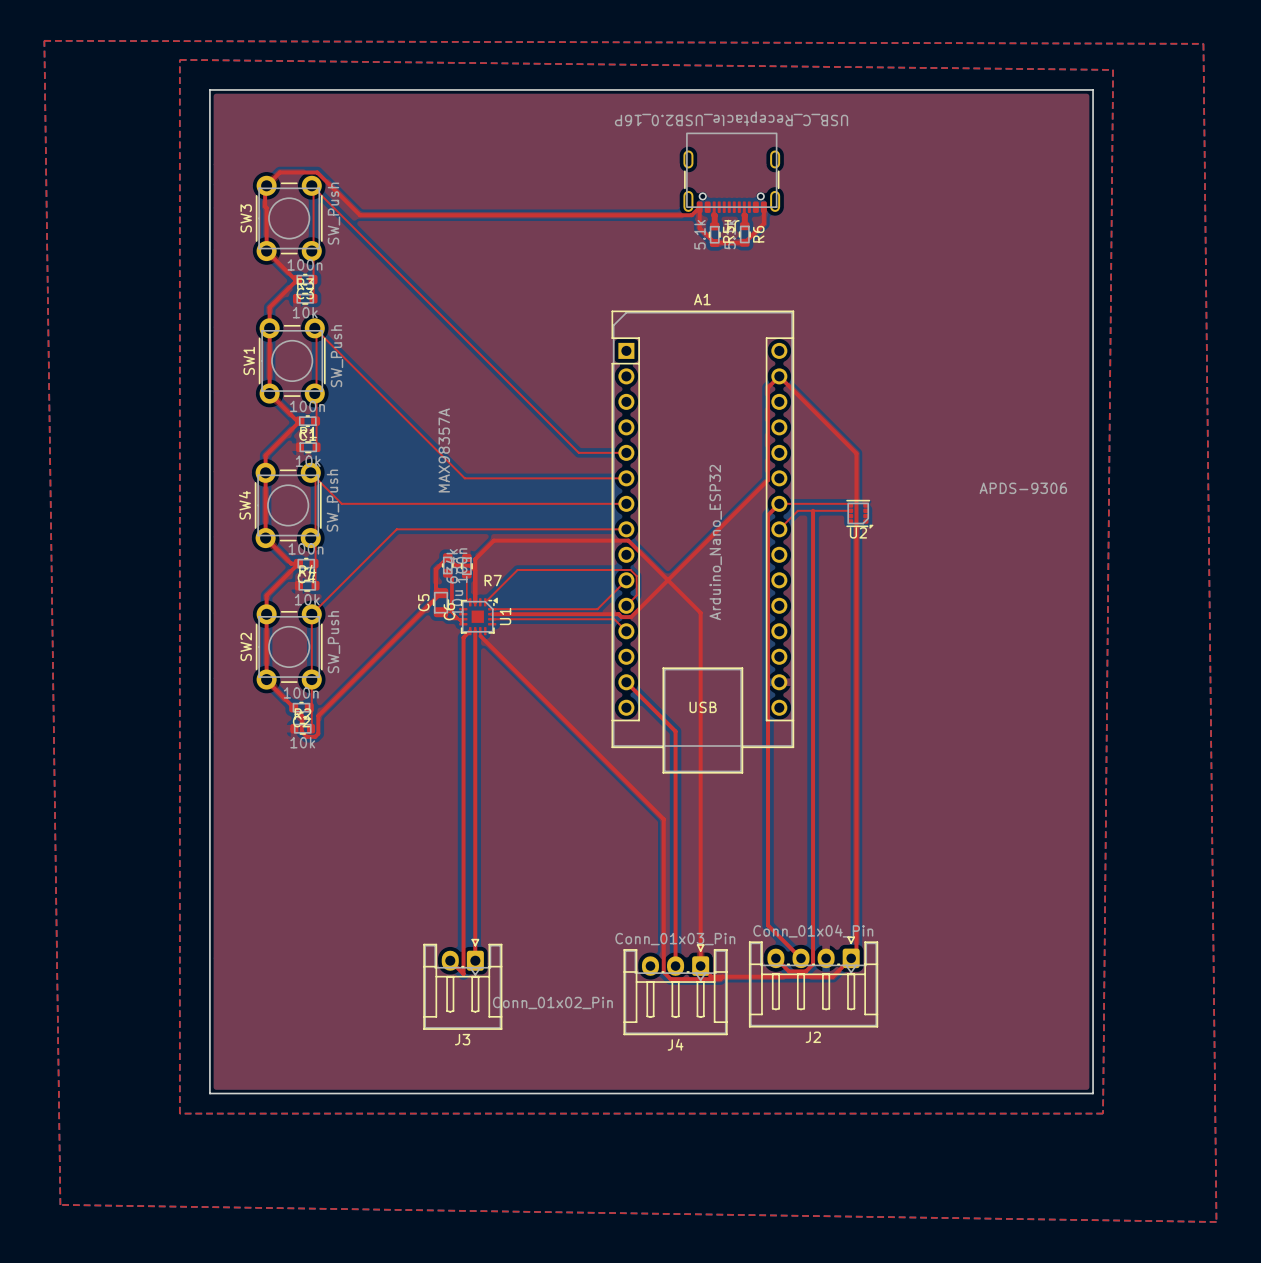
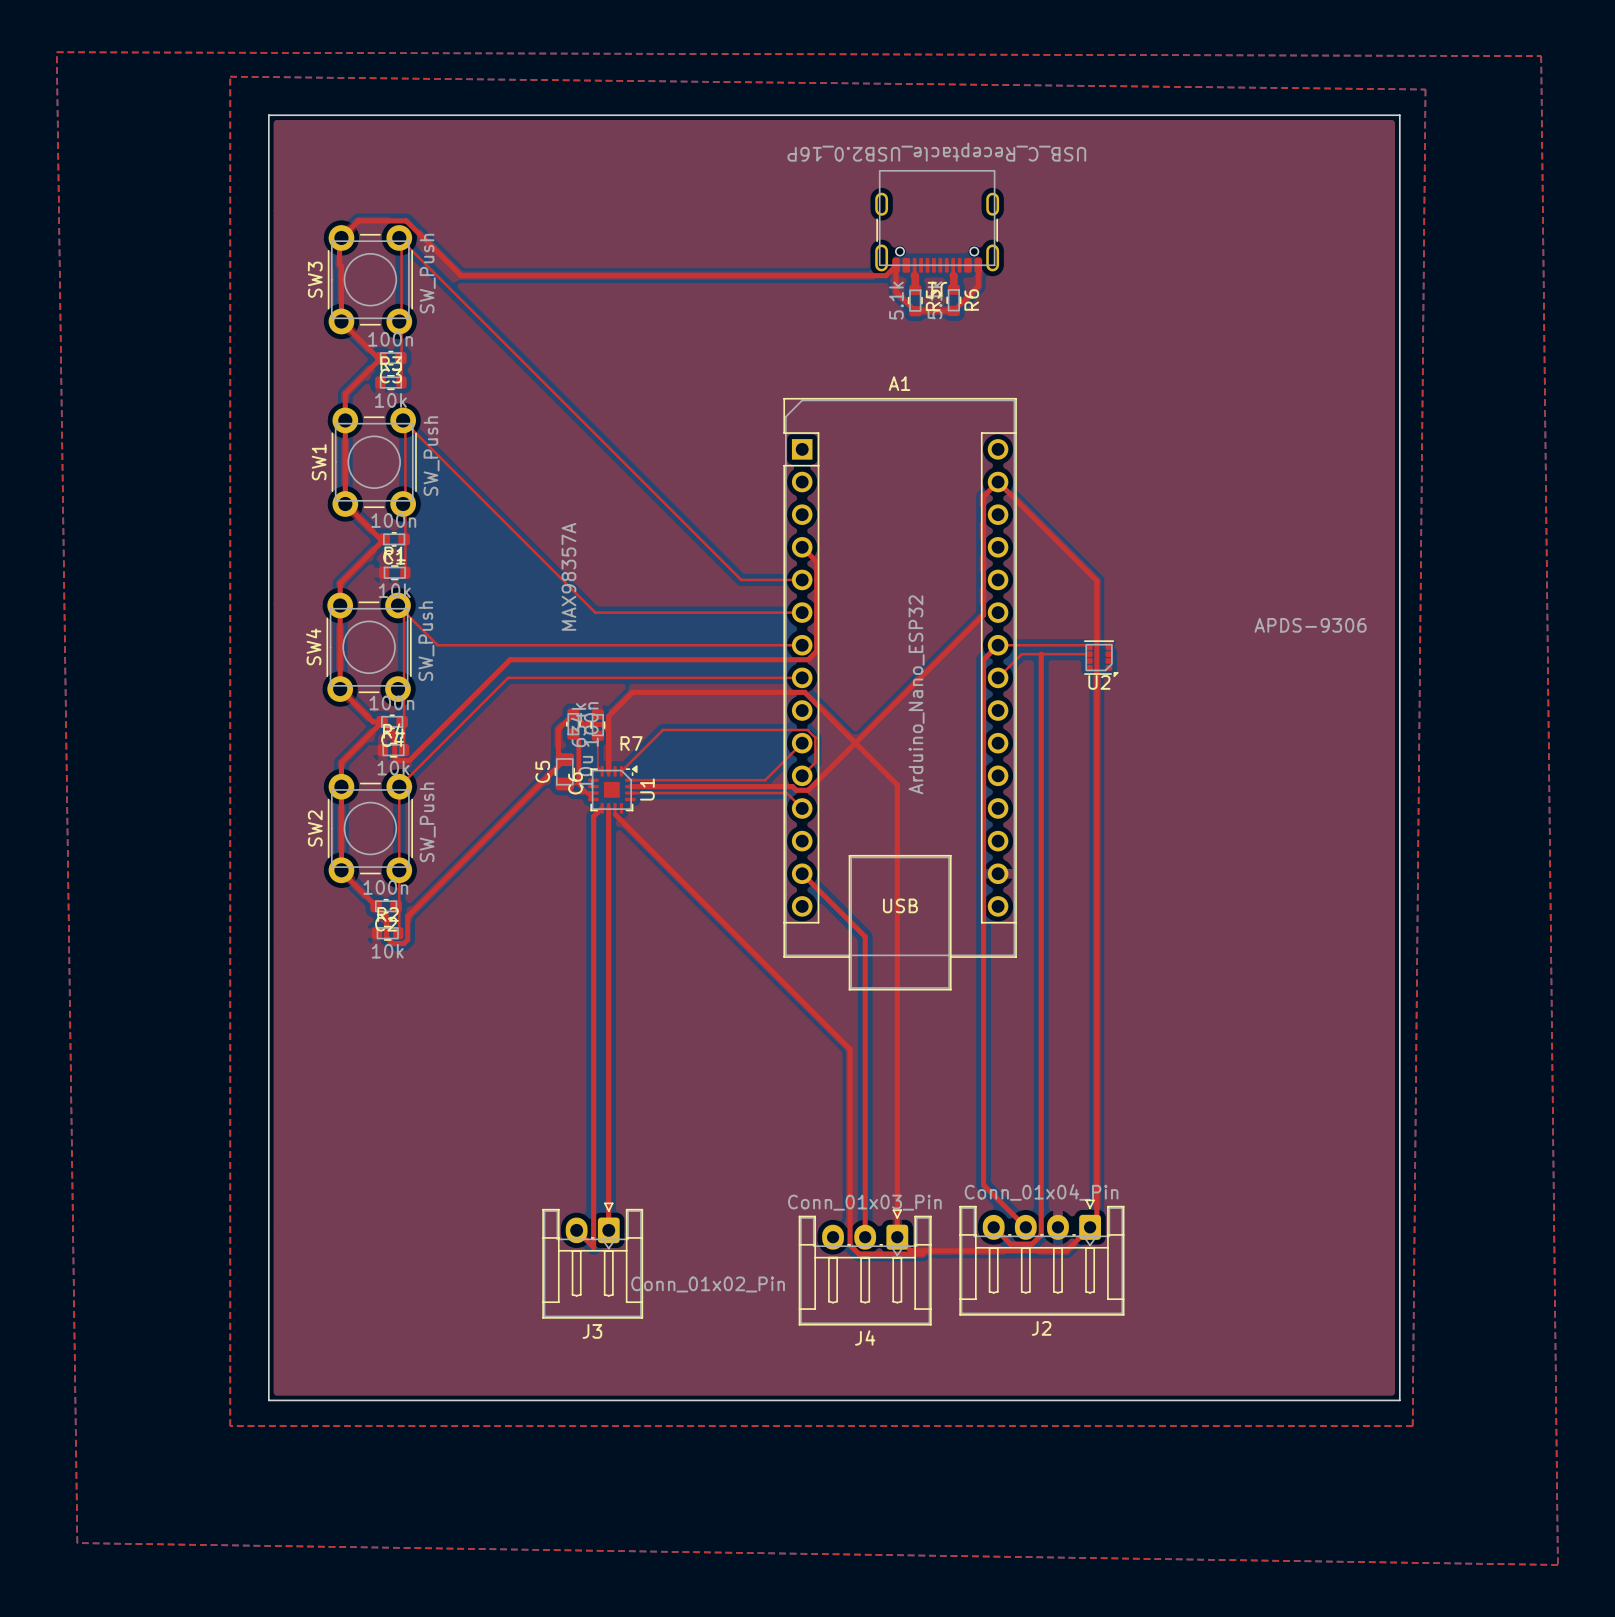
top track: none -> (802, 547) (816, 561) (816, 651) (808, 659) (510, 659) (409, 760) (398, 760) (394, 756) (394, 734) (382, 721)

